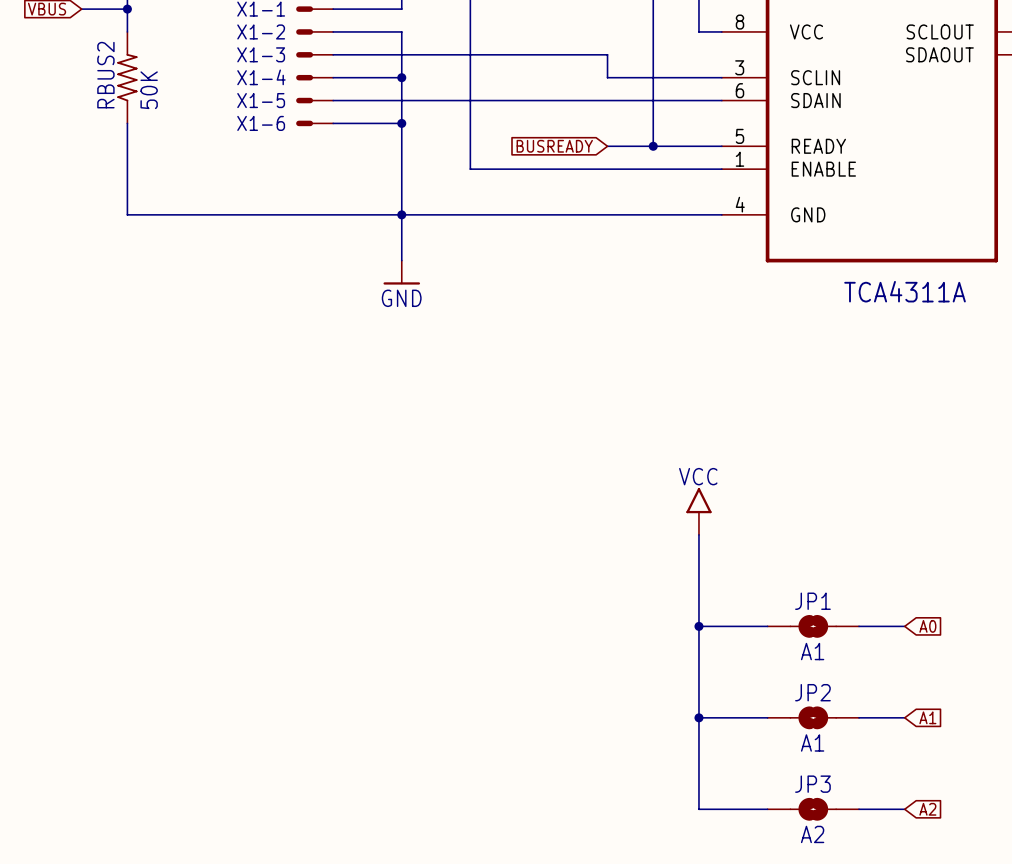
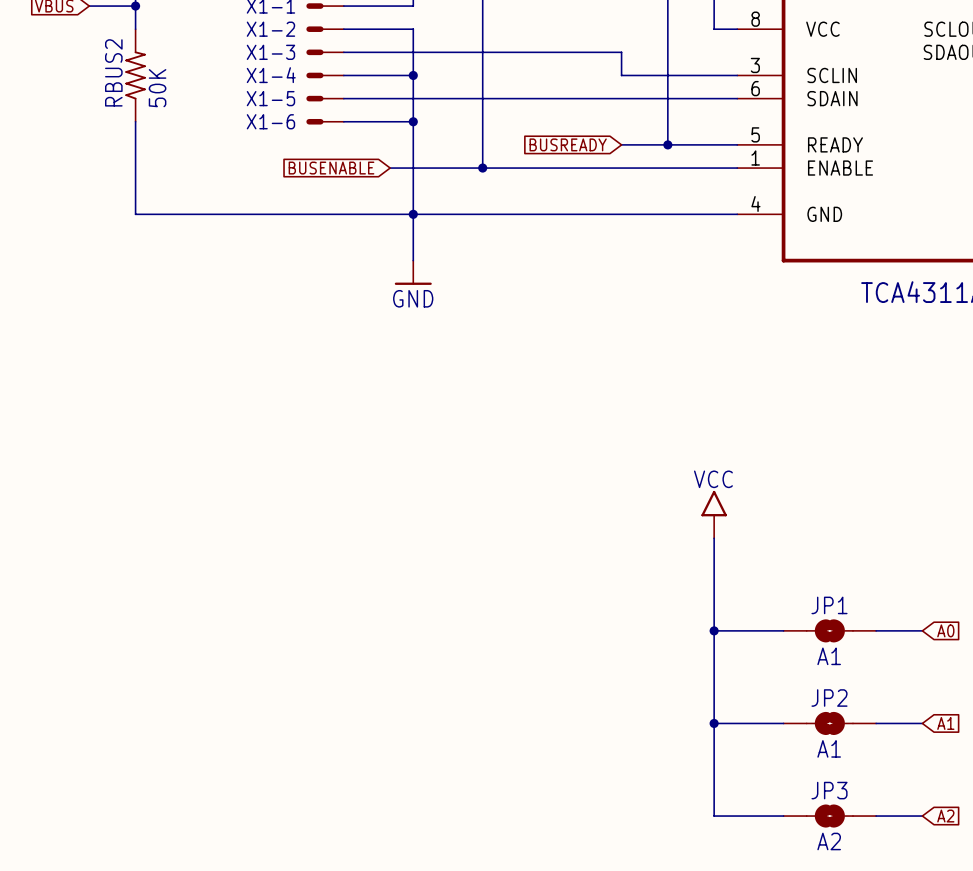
global label: none -> BUSENABLE (331, 168)
wire: none -> (390, 168) (482, 168)
junction: none -> (482, 168)

